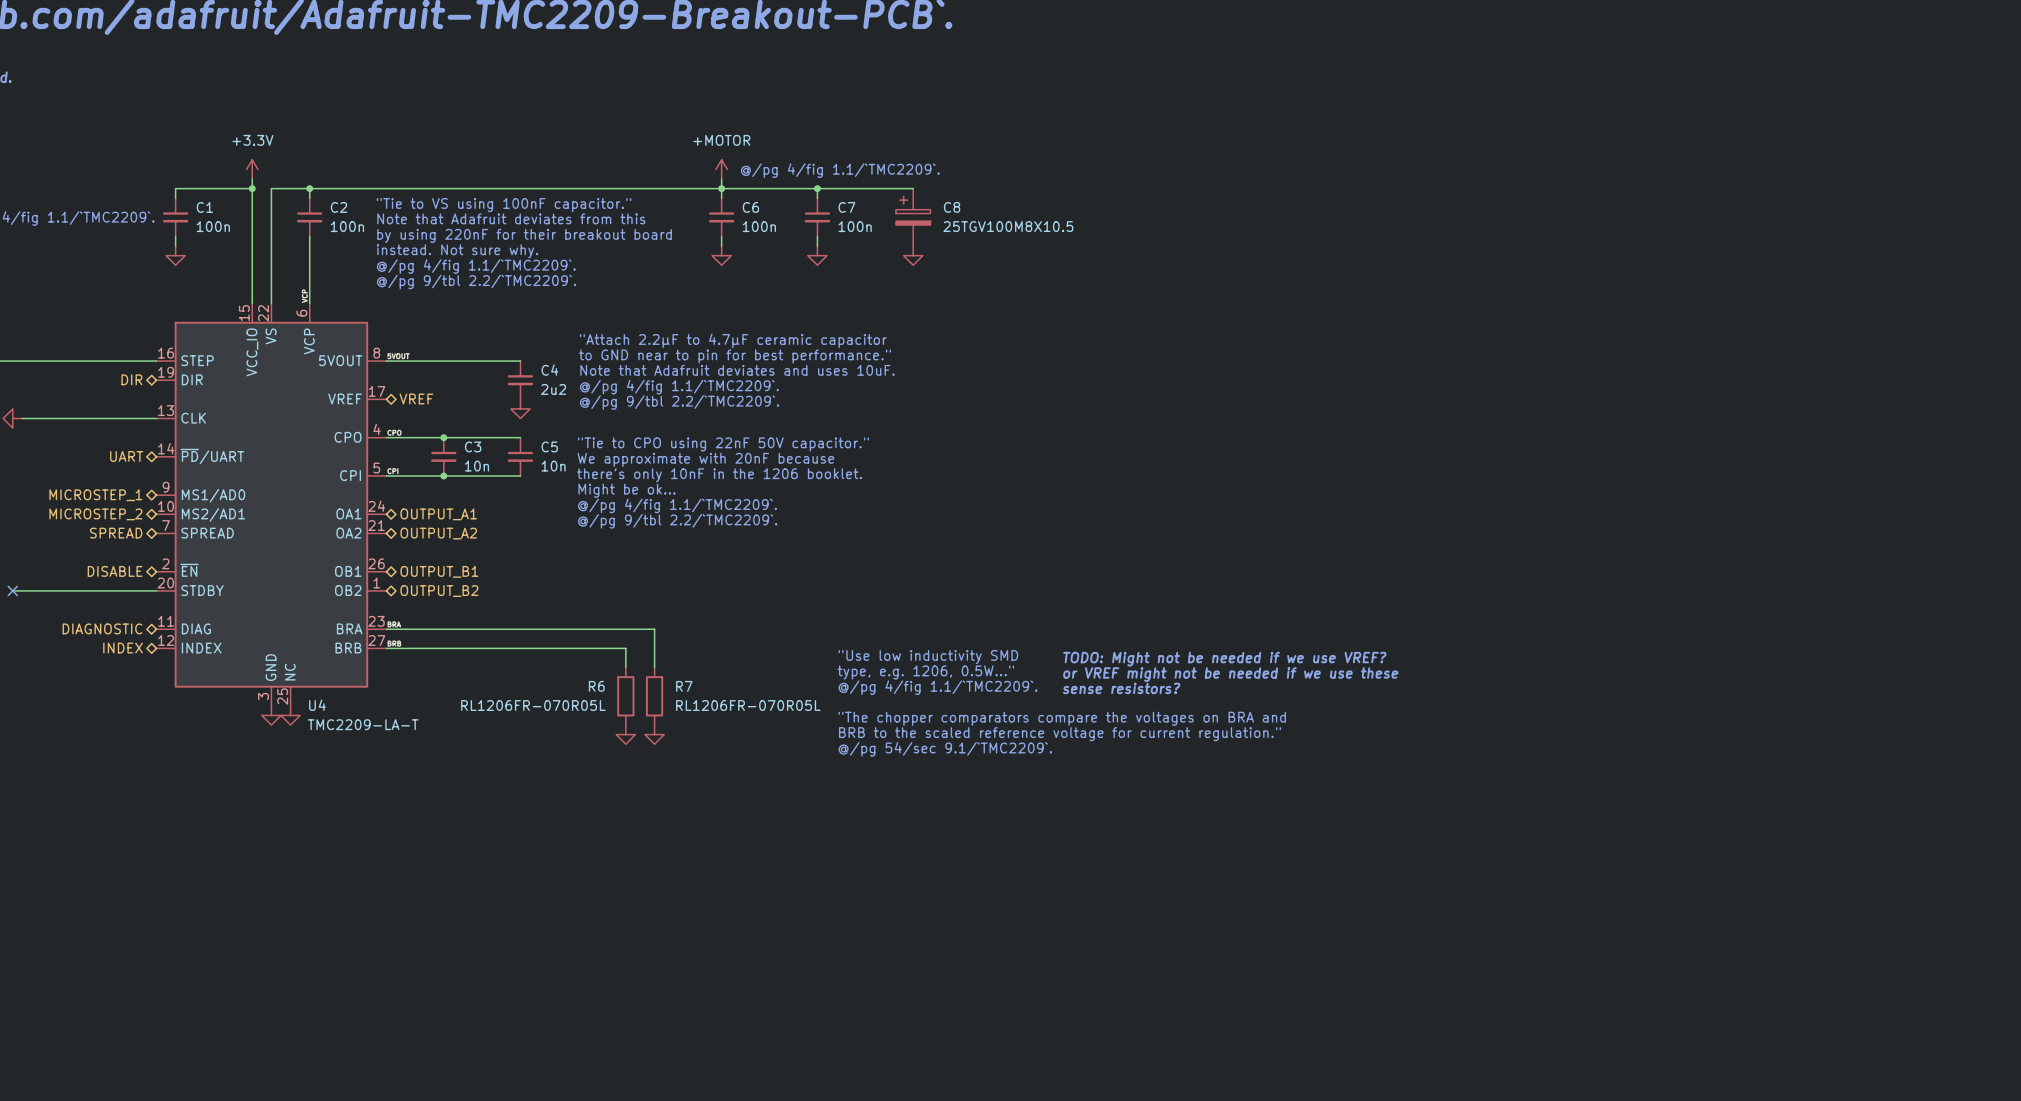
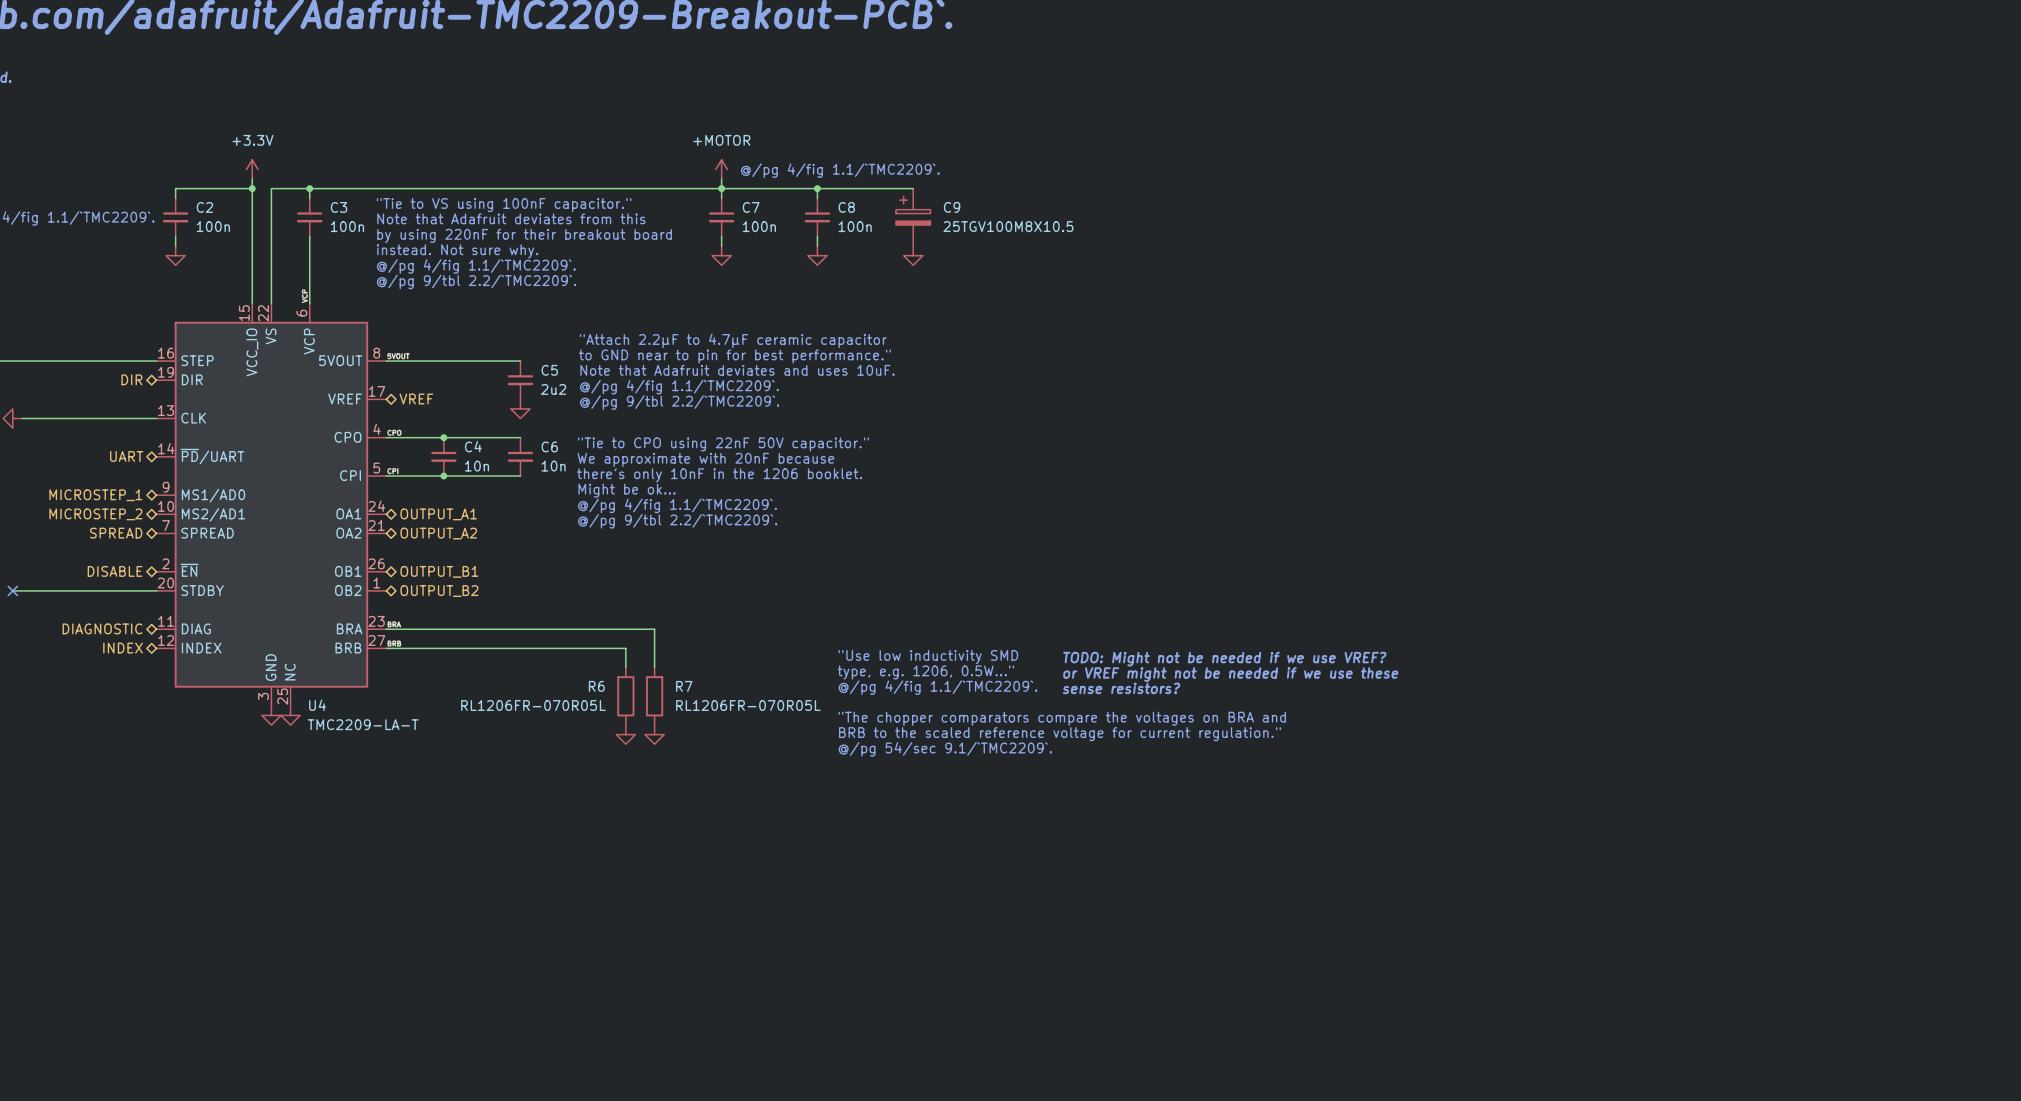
C1 name: C1 (204, 207) -> C2 (204, 207)
C2 name: C2 (339, 207) -> C3 (339, 207)
C6 name: C6 (750, 207) -> C7 (751, 207)
C7 name: C7 (846, 207) -> C8 (846, 207)
C8 name: C8 (952, 207) -> C9 (952, 207)
C4 name: C4 (549, 370) -> C5 (549, 370)
C3 name: C3 (473, 446) -> C4 (473, 446)
C5 name: C5 (549, 446) -> C6 (549, 446)

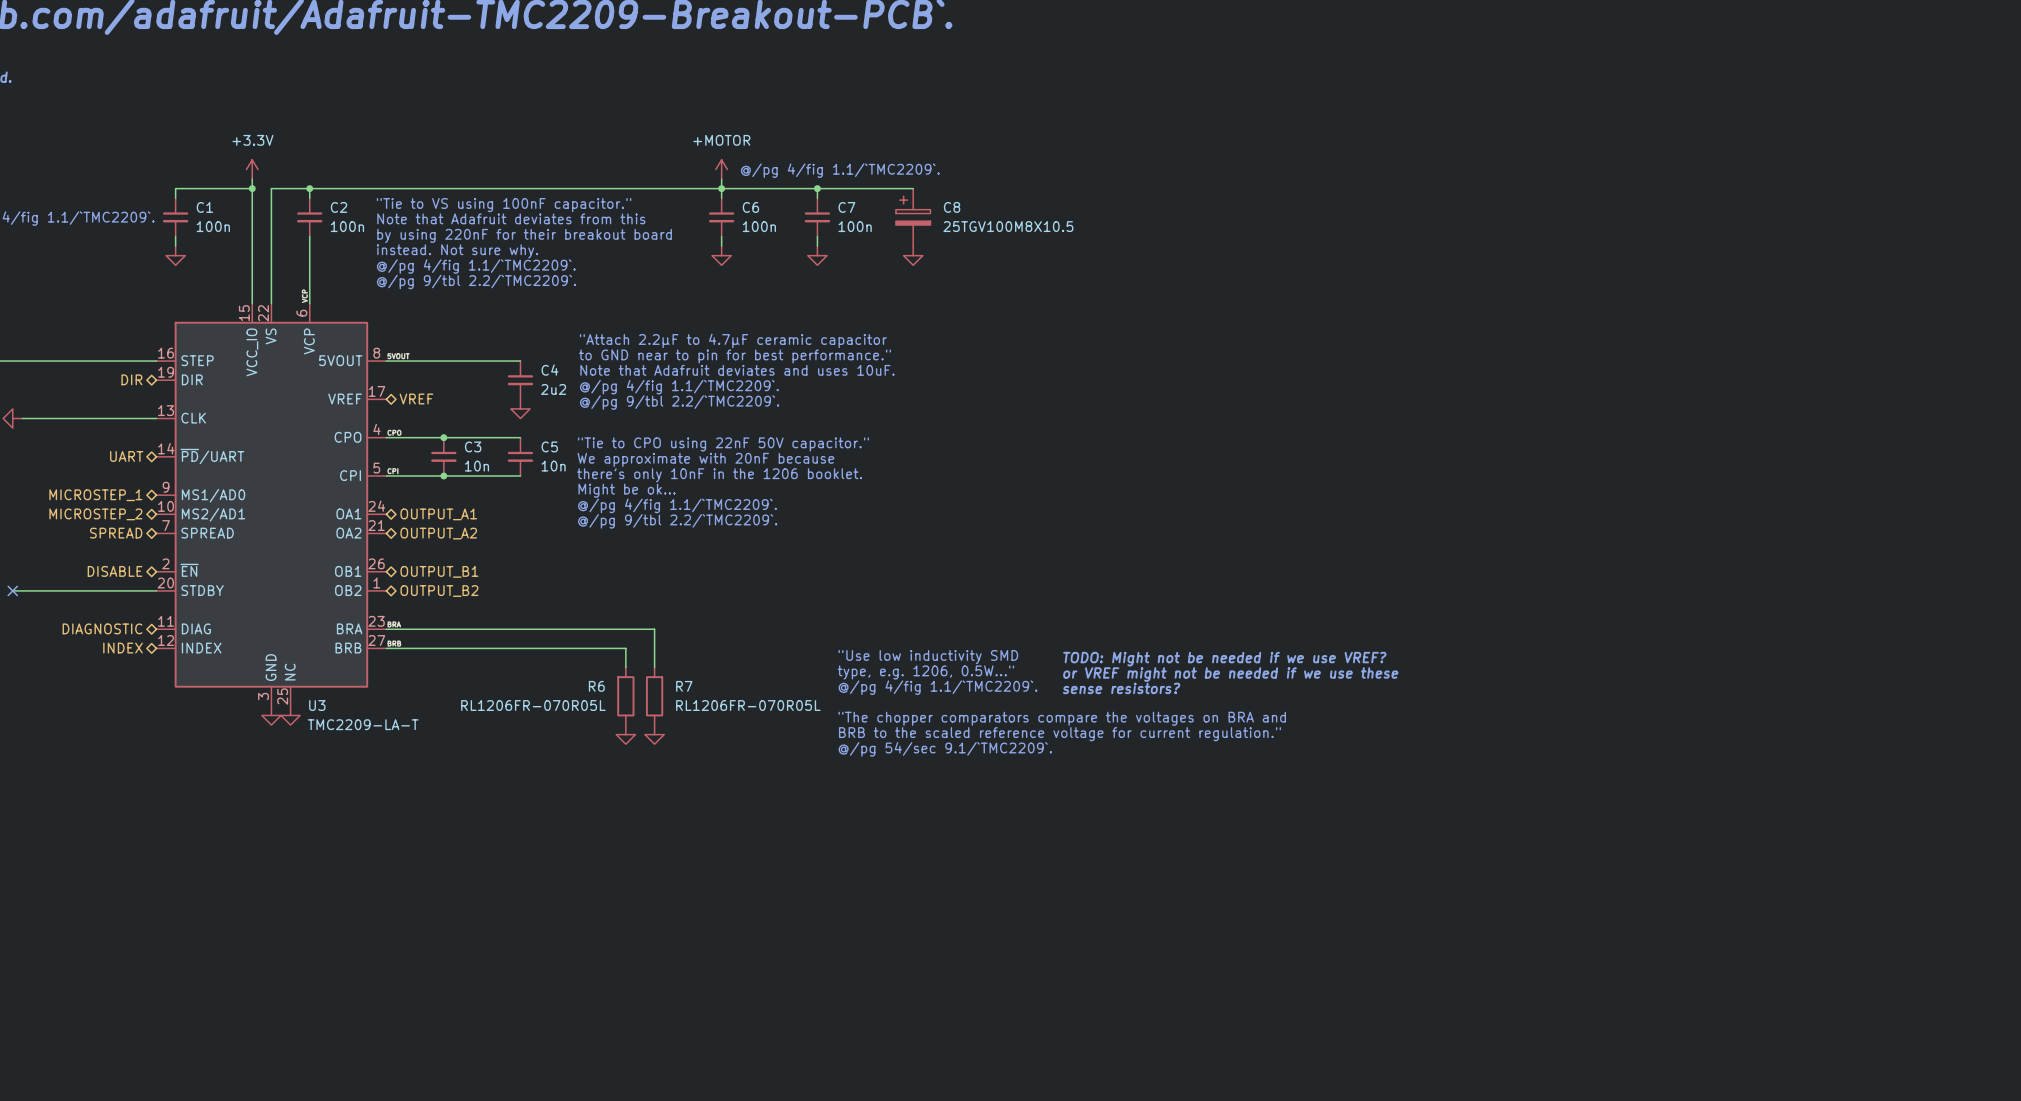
C2 name: C2 (204, 207) -> C1 (204, 207)
C3 name: C3 (339, 207) -> C2 (339, 207)
C7 name: C7 (751, 207) -> C6 (750, 207)
C8 name: C8 (846, 207) -> C7 (846, 207)
C9 name: C9 (952, 207) -> C8 (952, 207)
C5 name: C5 (549, 370) -> C4 (549, 370)
C4 name: C4 (473, 446) -> C3 (473, 446)
C6 name: C6 (549, 446) -> C5 (549, 446)
U4 name: U4 (317, 705) -> U3 (317, 705)

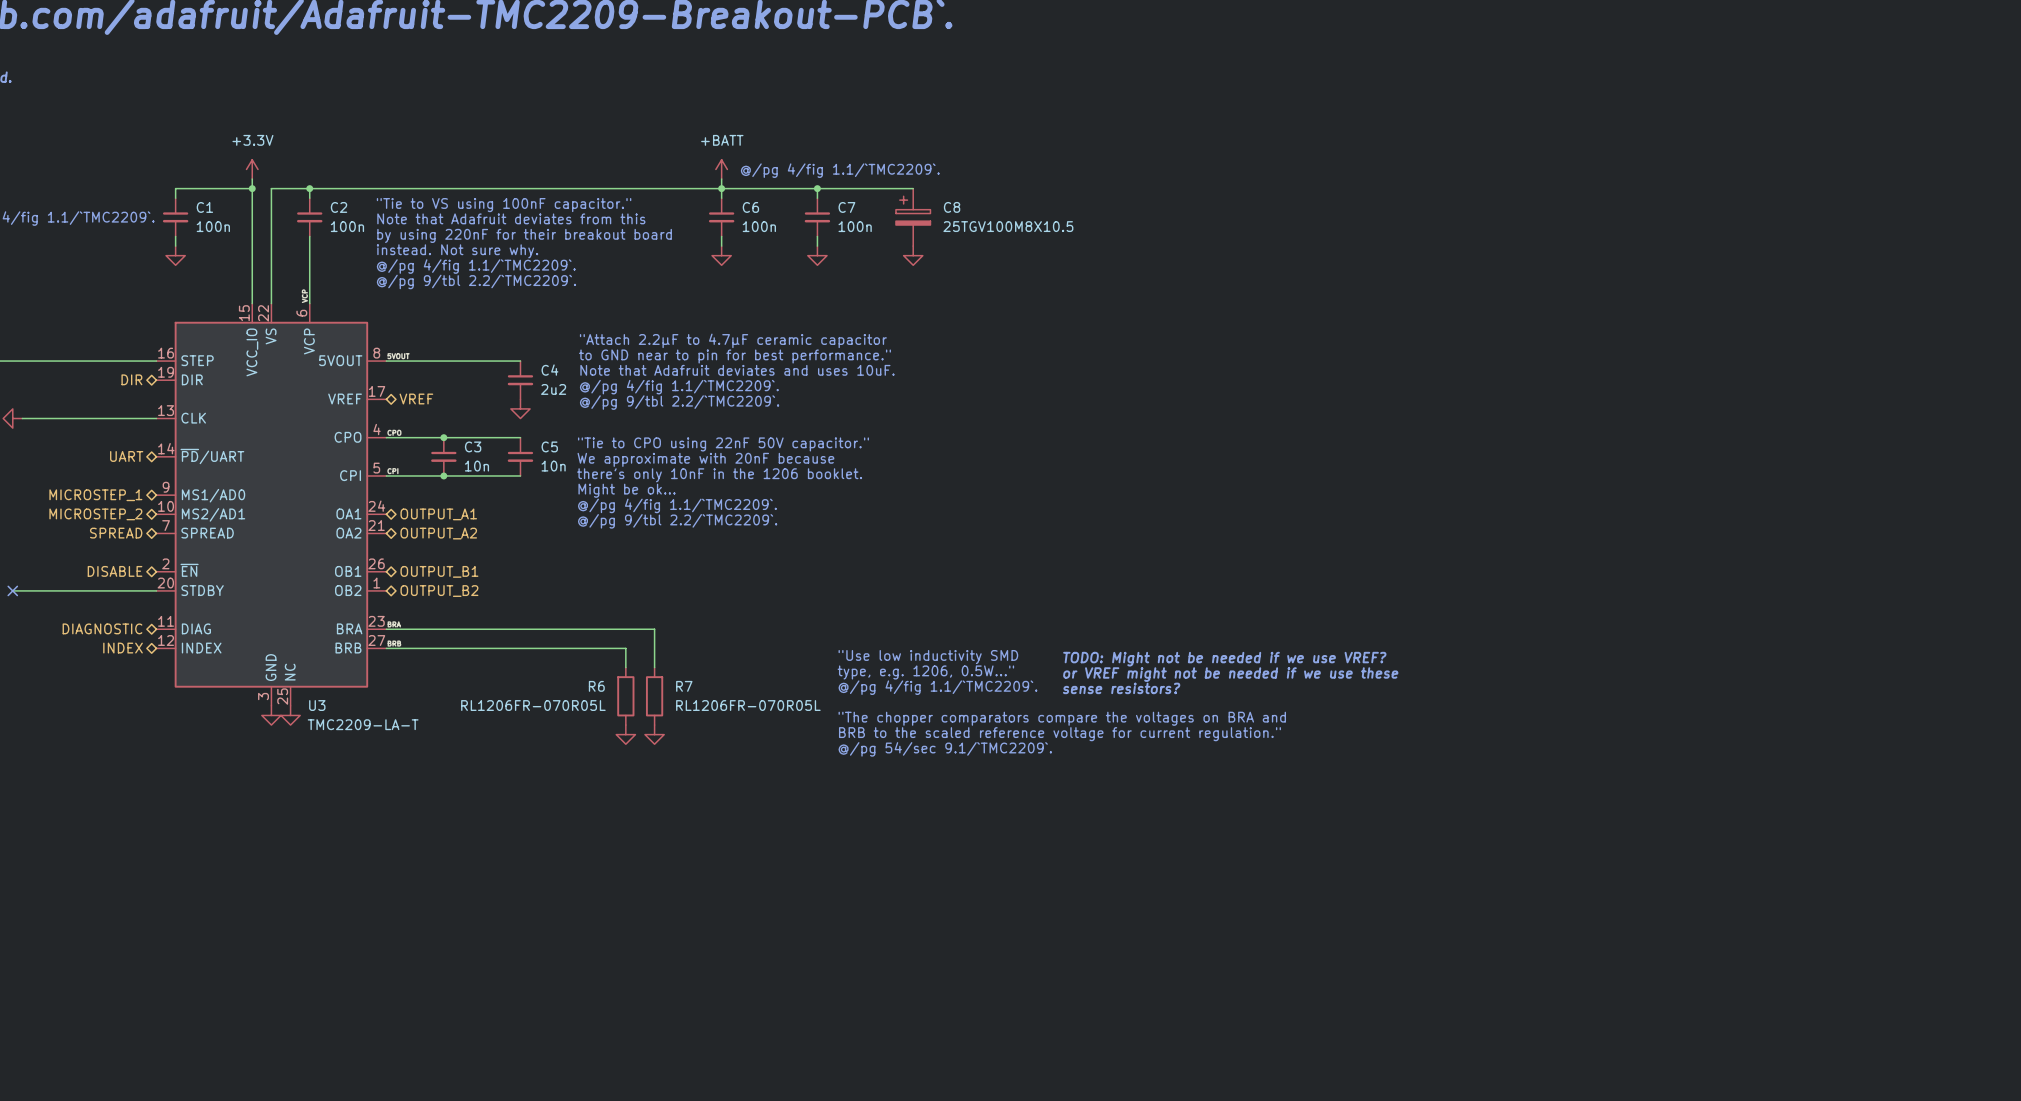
power symbol: +MOTOR (721, 169) -> +BATT (721, 169)

